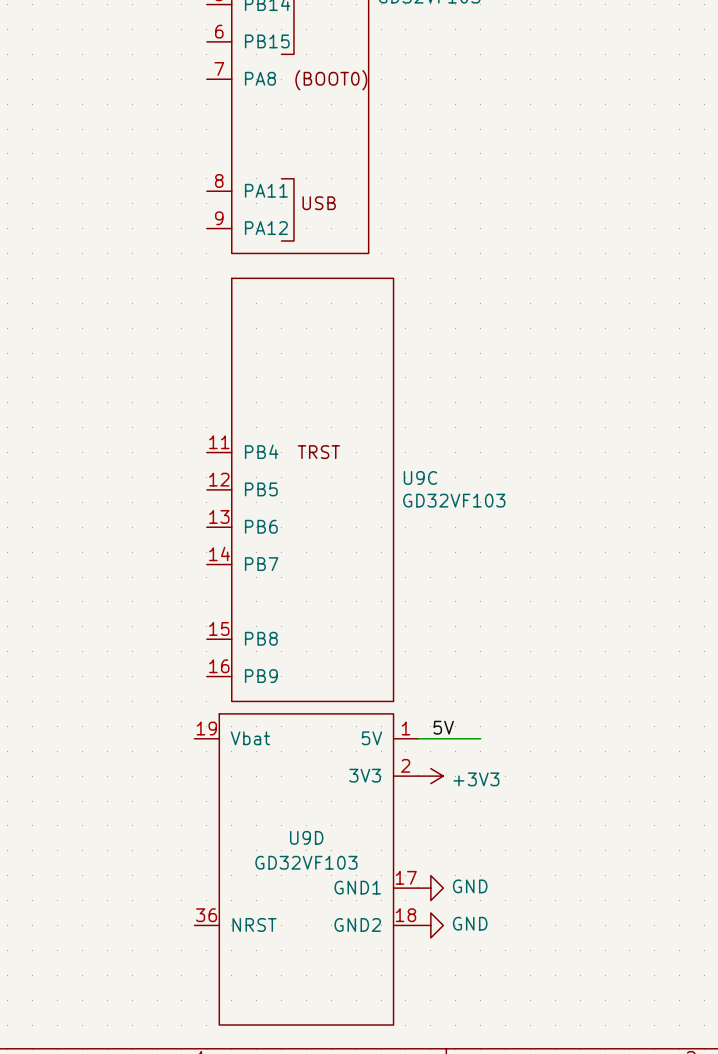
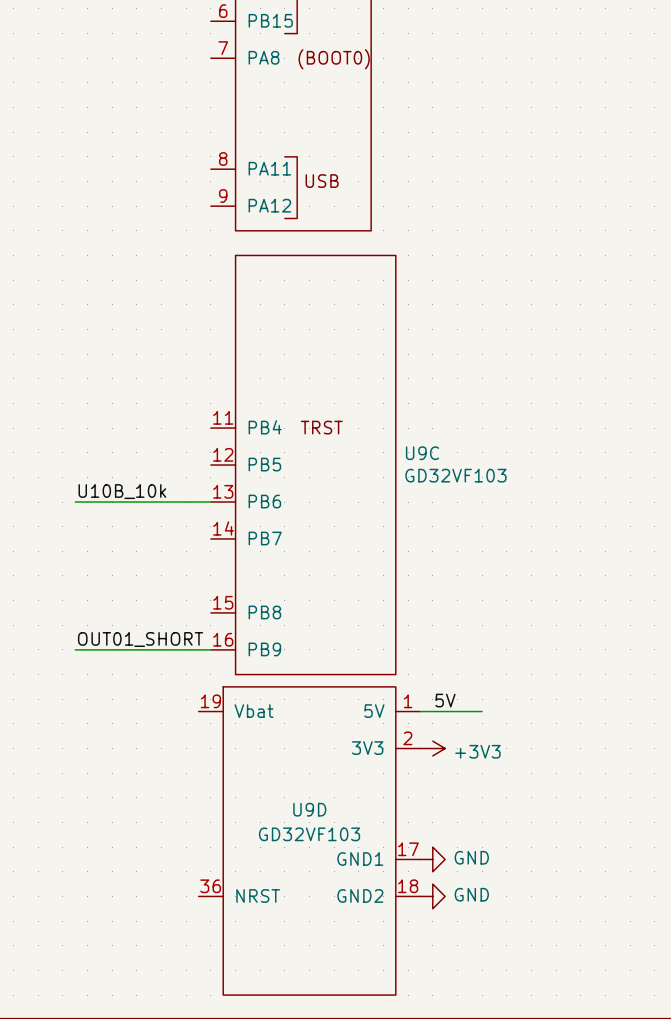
label: none -> U10B_10k (122, 491)
wire: none -> (75, 502) (210, 502)
label: none -> OUT01_SHORT (140, 639)
wire: none -> (75, 649) (210, 649)

